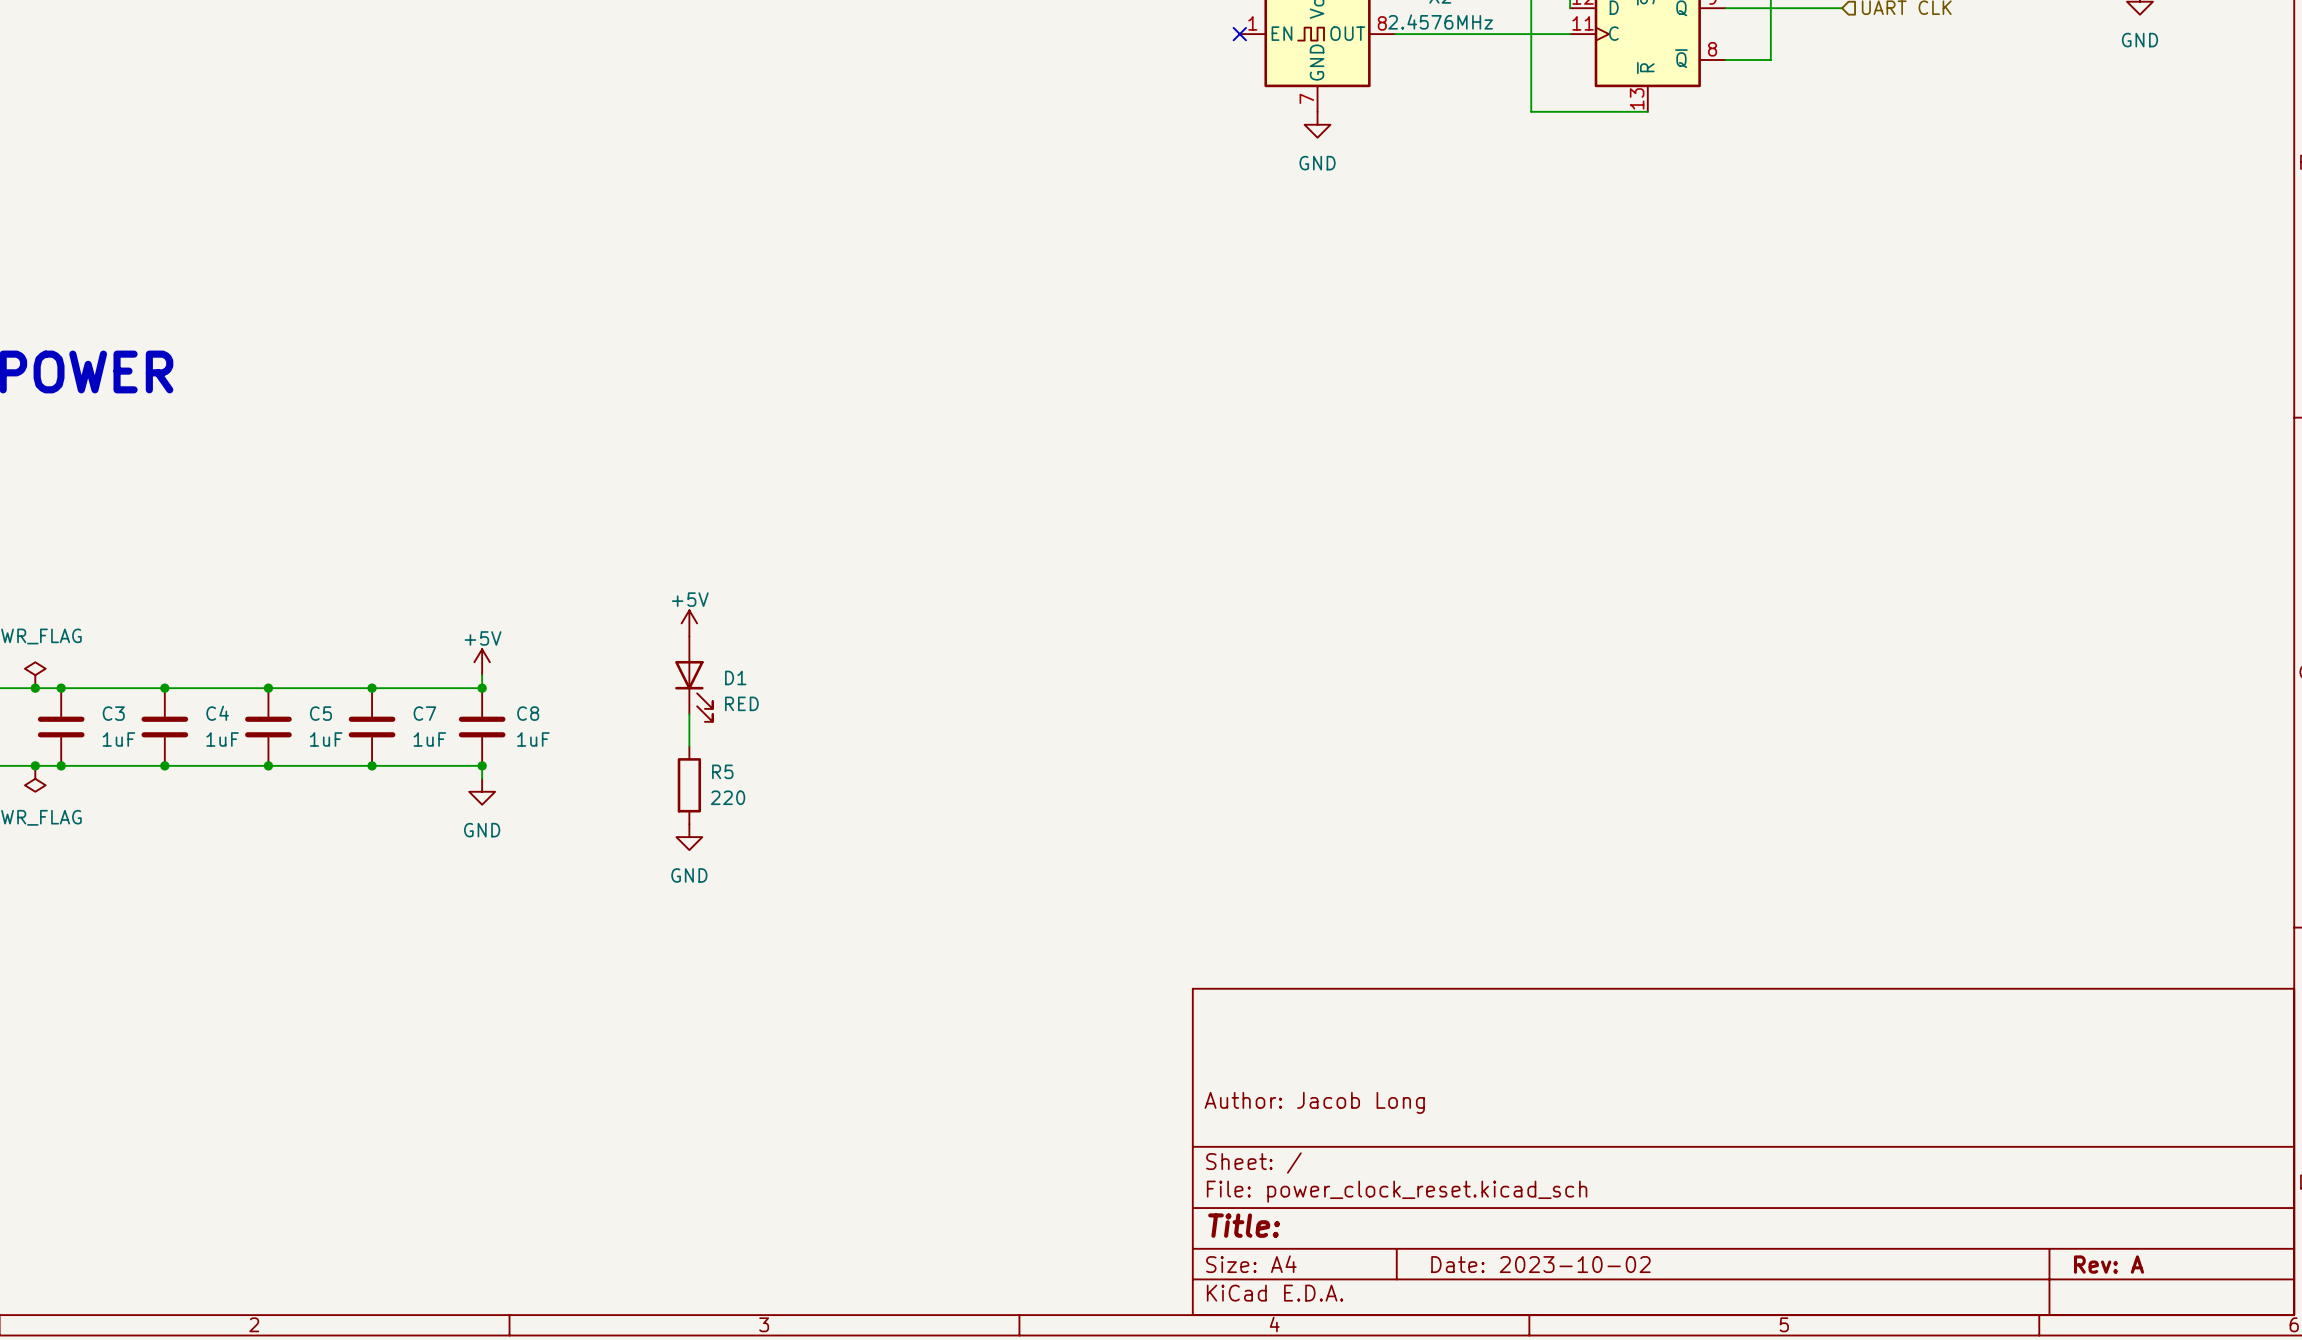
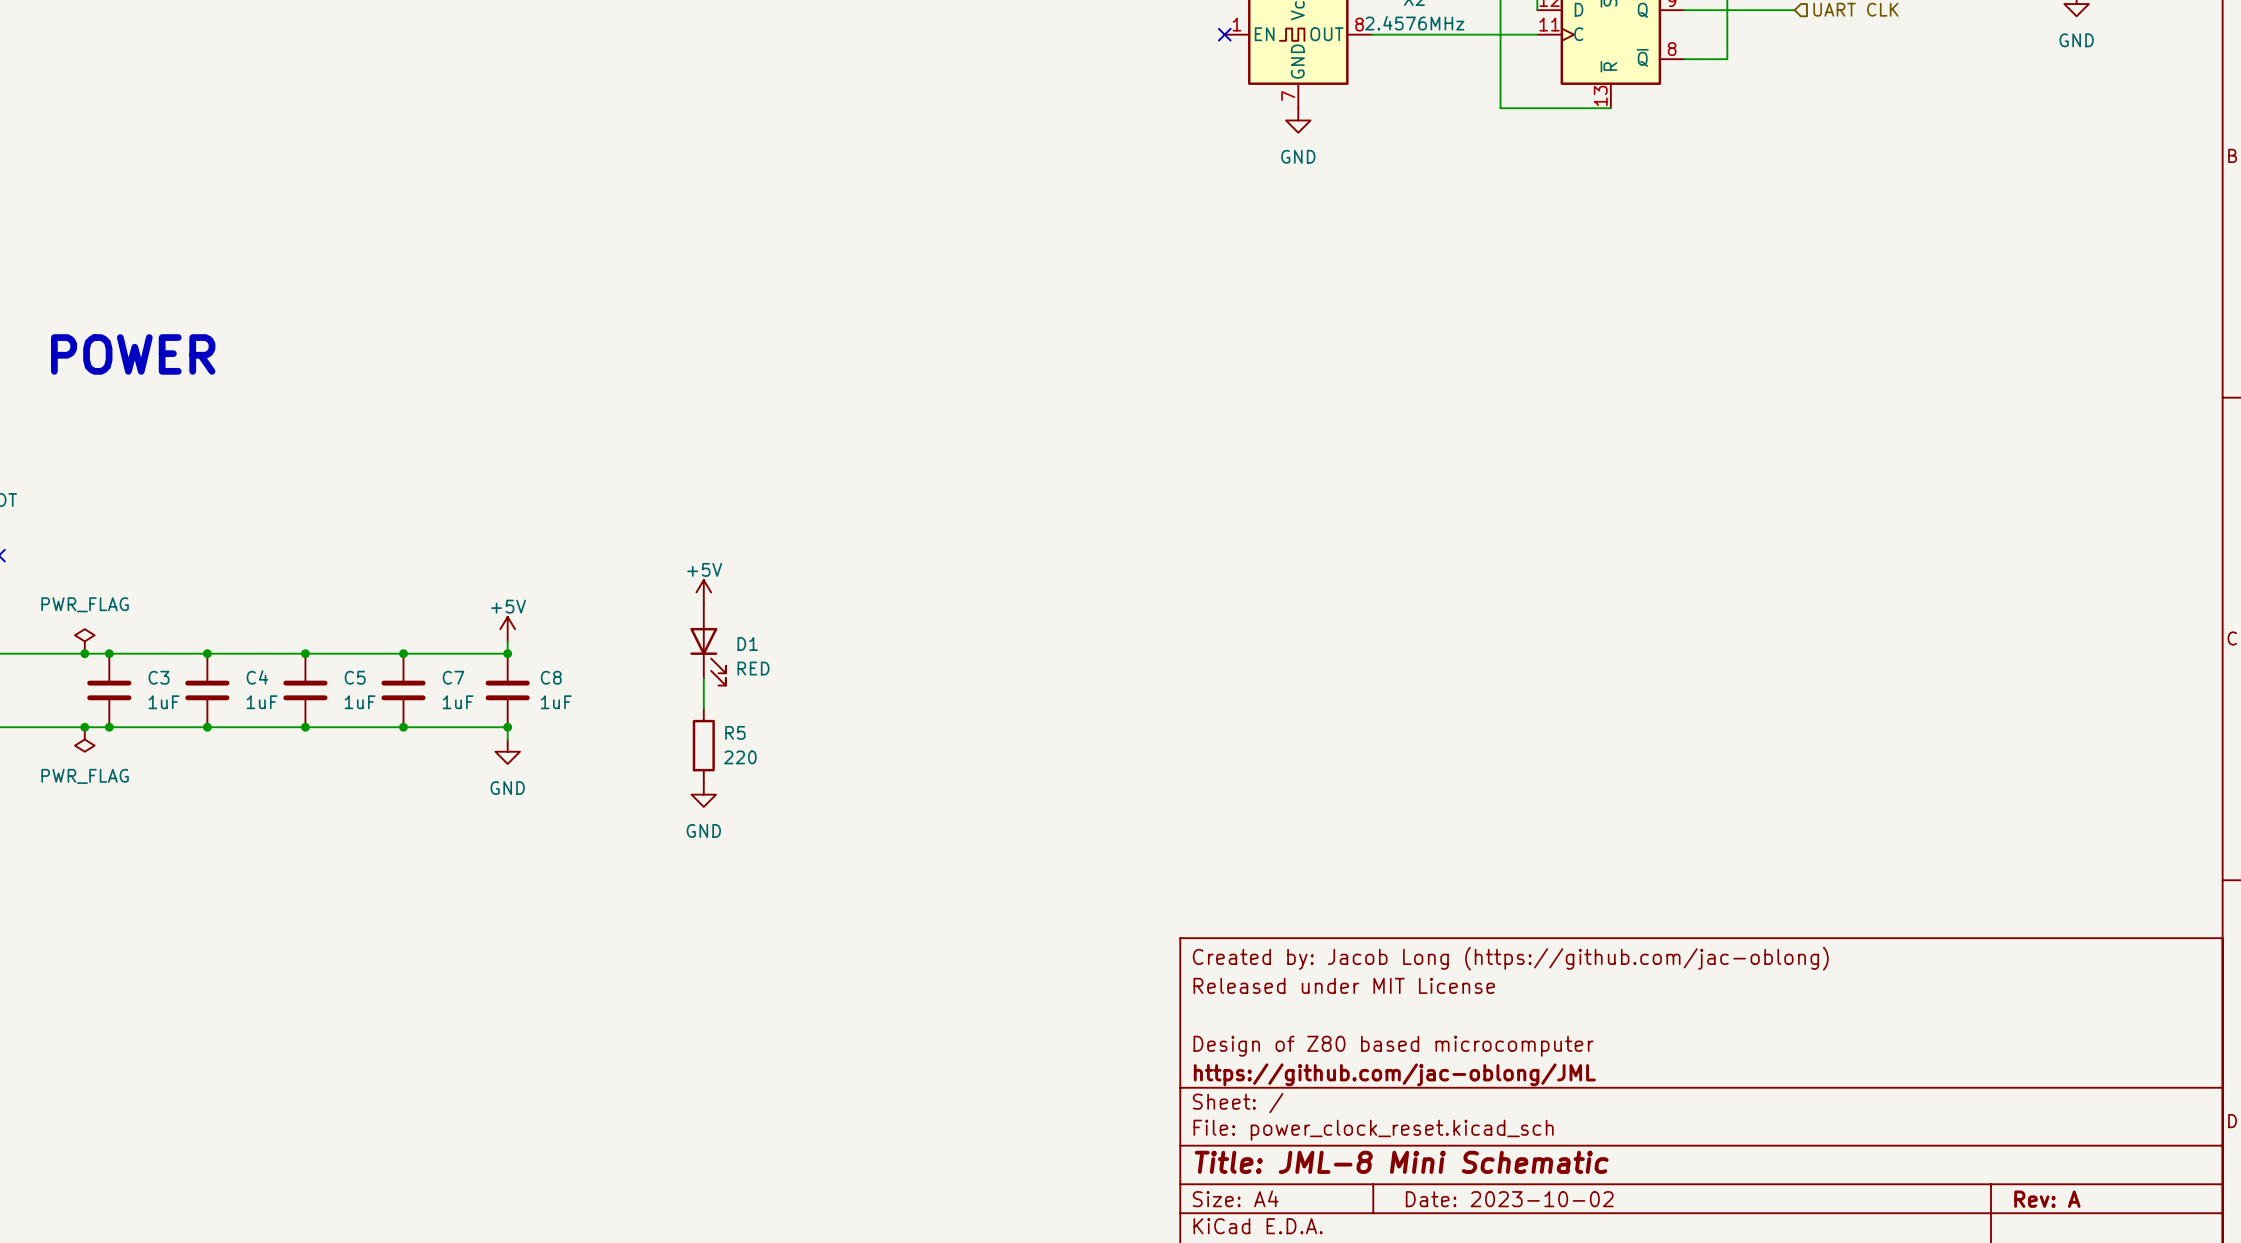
title block: none -> Created by: Jacob Long (https://github.com/jac-oblong) (1510, 958)
title block: none -> Released under MIT License (1344, 985)
title block: Author: Jacob Long (1314, 1102) -> Design of Z80 based microcomputer (1393, 1046)
title block: none -> https://github.com/jac-oblong/JML (1394, 1074)
title block: Title: (1244, 1225) -> Title: JML-8 Mini Schematic (1401, 1162)

